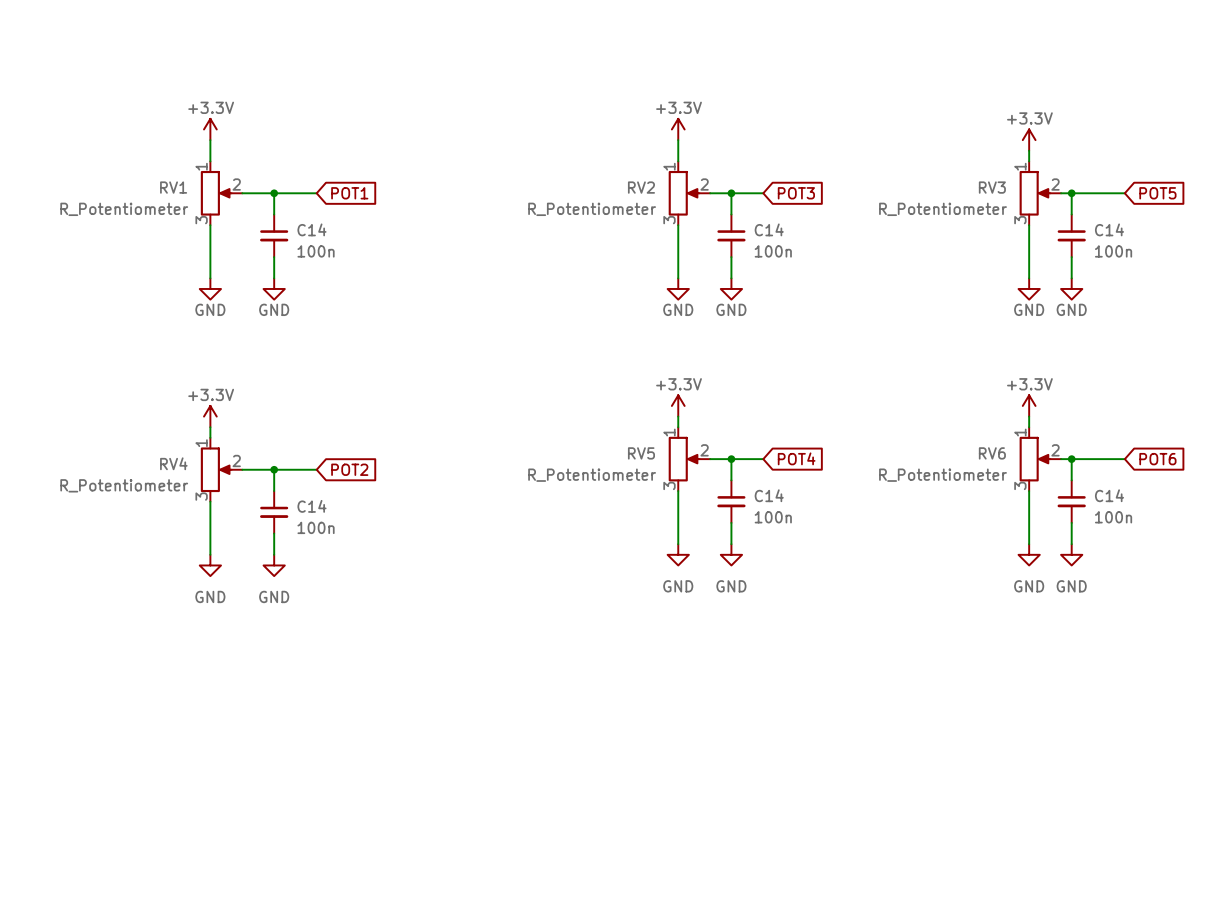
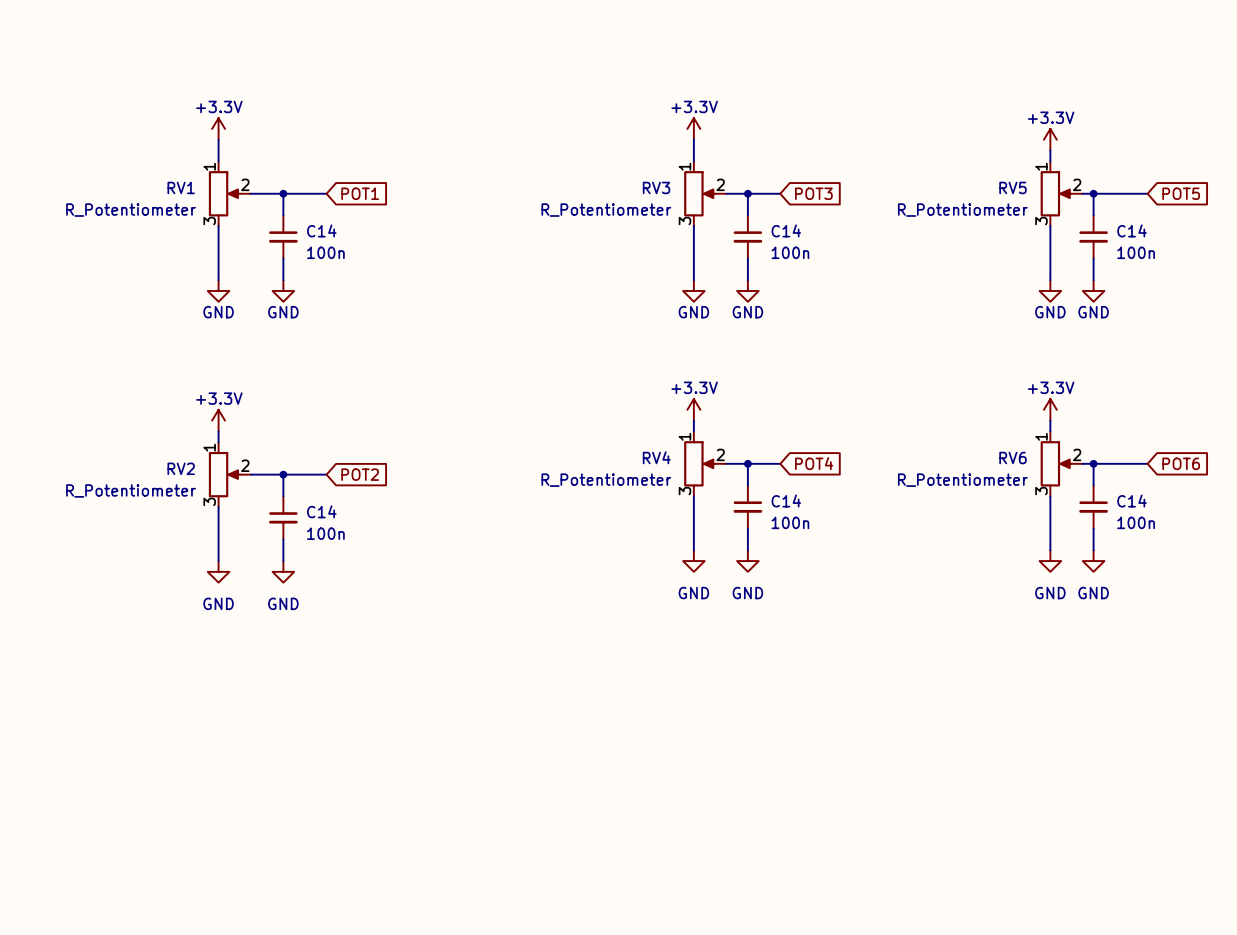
RV2 name: RV2 (641, 187) -> RV3 (656, 187)
RV3 name: RV3 (992, 187) -> RV5 (1013, 187)
RV5 name: RV5 (641, 453) -> RV4 (656, 457)
RV4 name: RV4 (173, 463) -> RV2 (181, 468)

